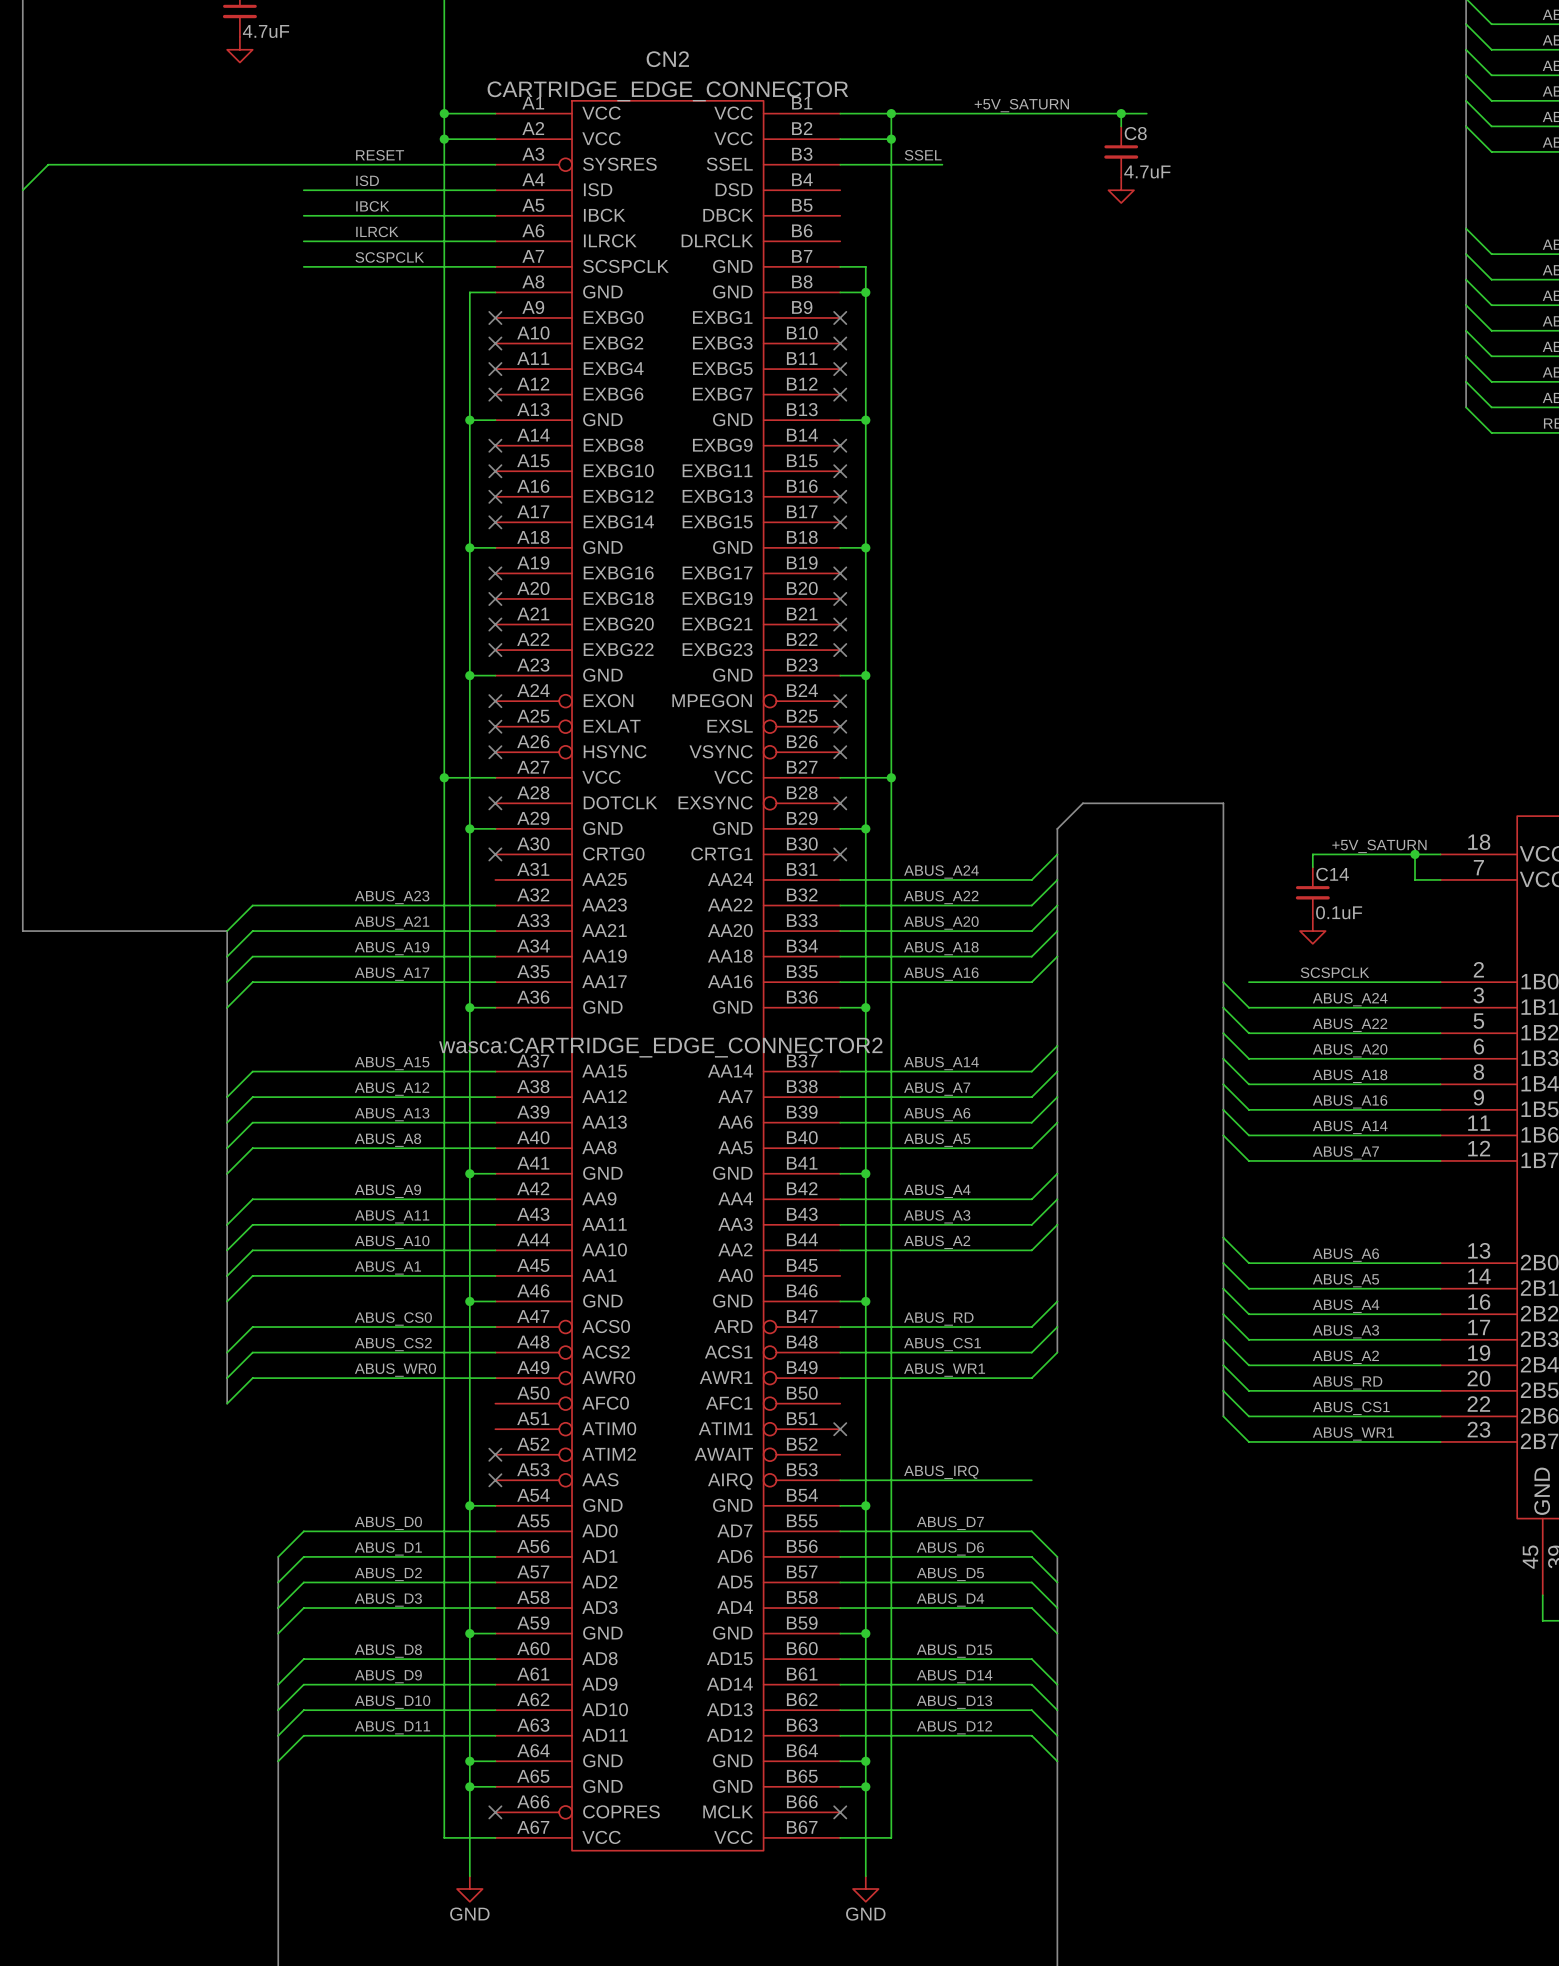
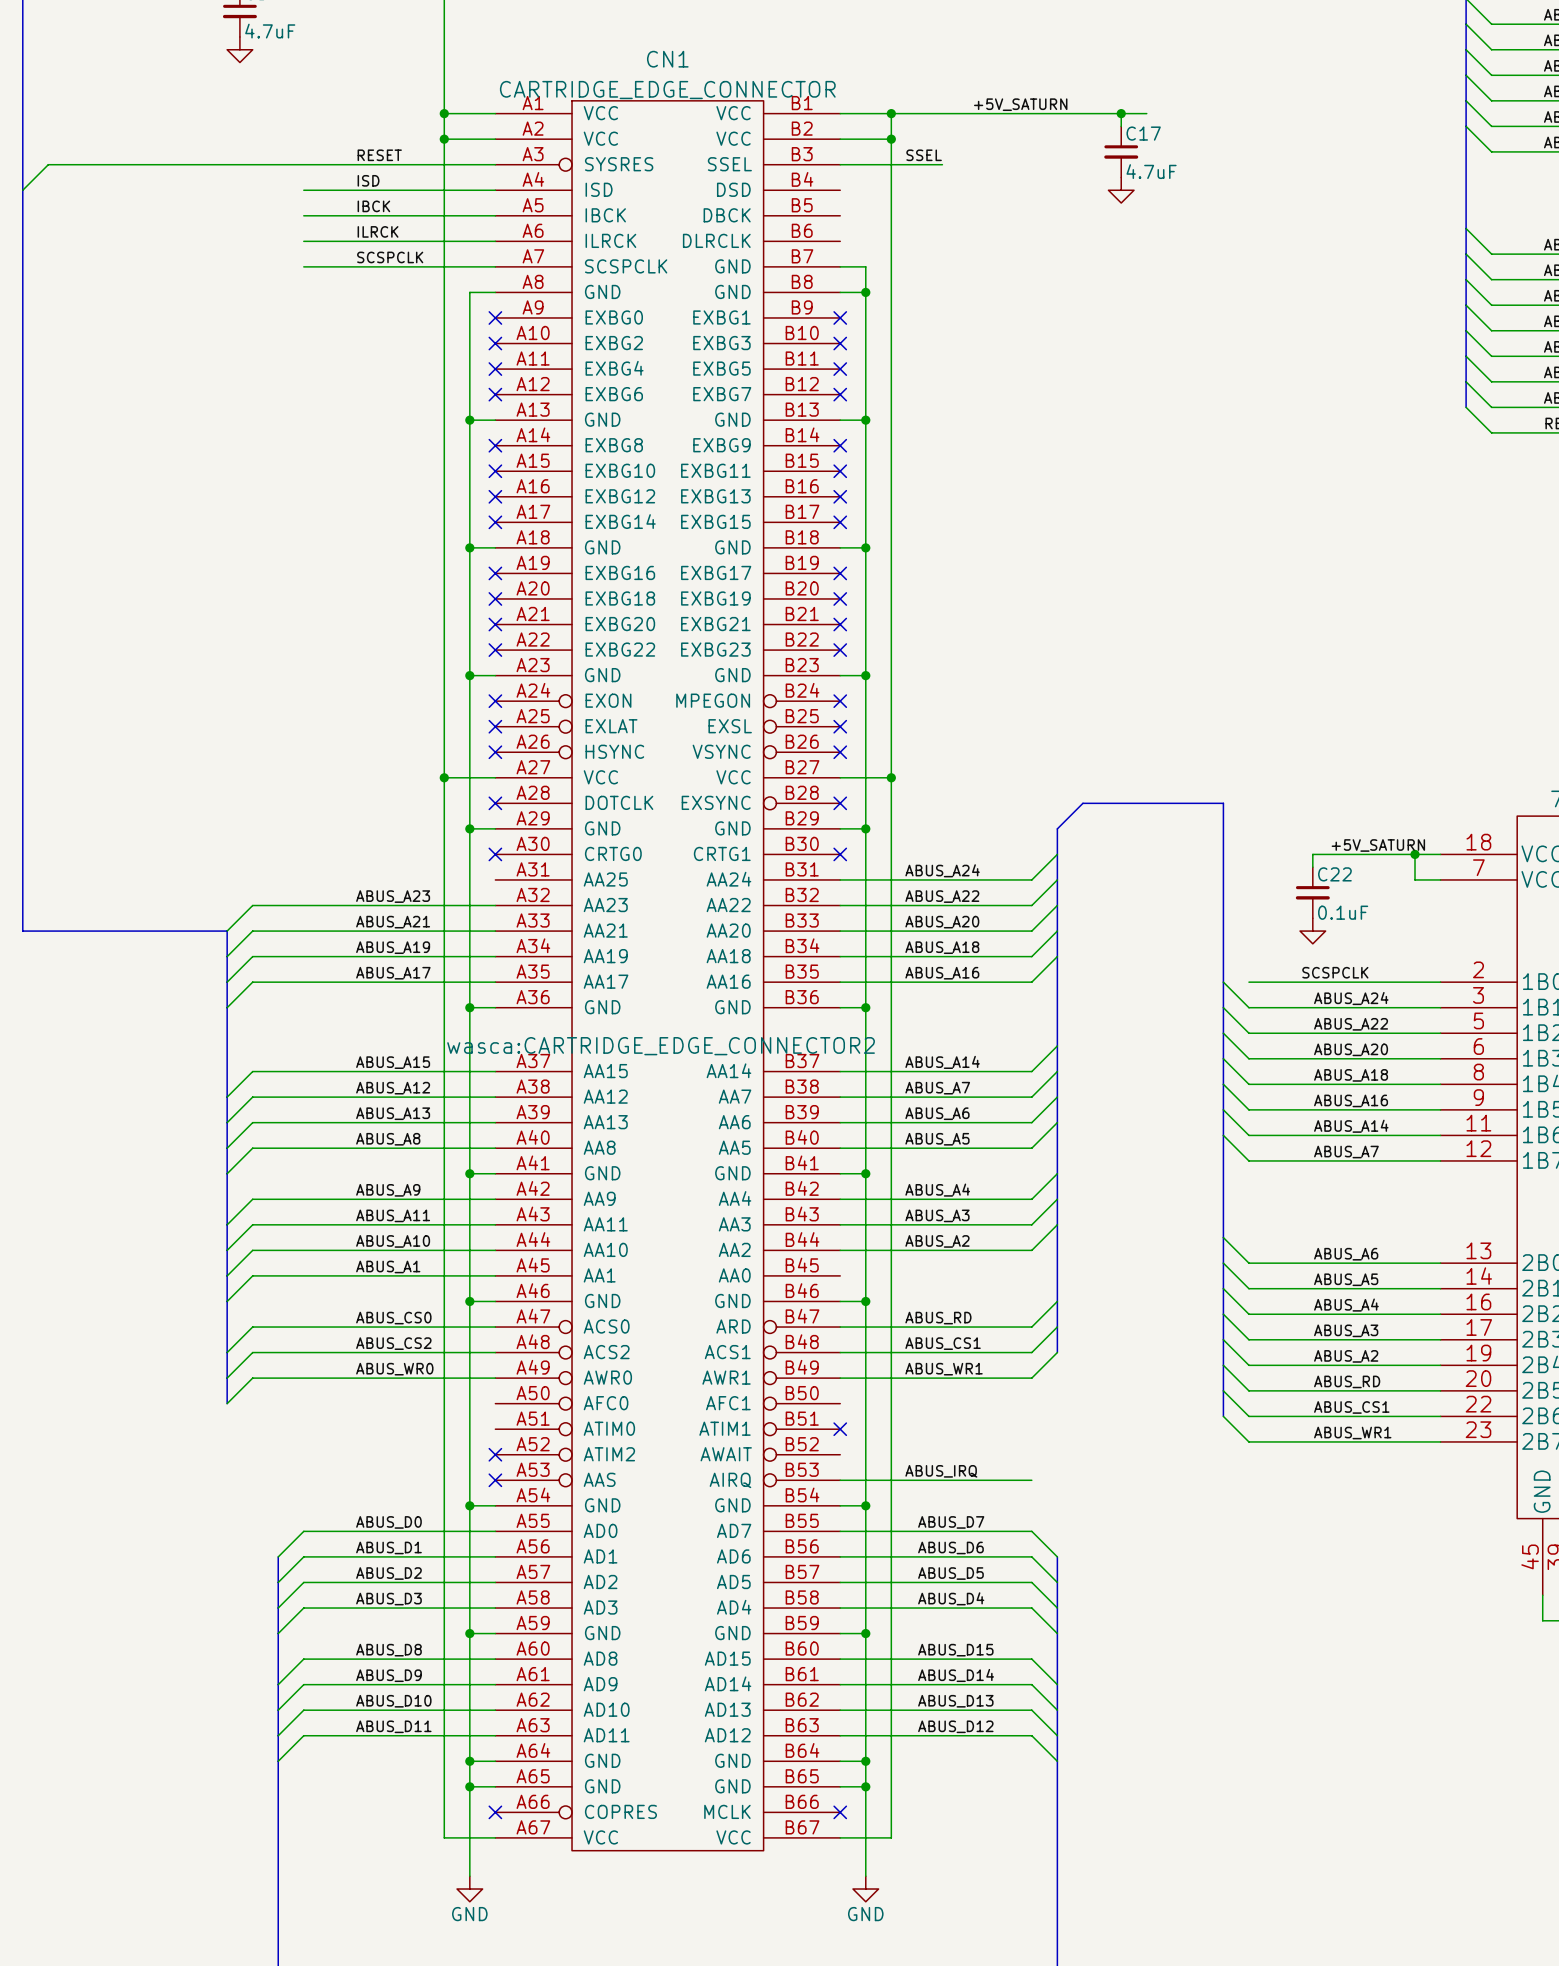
CN2 name: CN2 (667, 59) -> CN1 (667, 59)
C8 name: C8 (1135, 133) -> C17 (1143, 133)
C14 name: C14 (1332, 874) -> C22 (1334, 874)

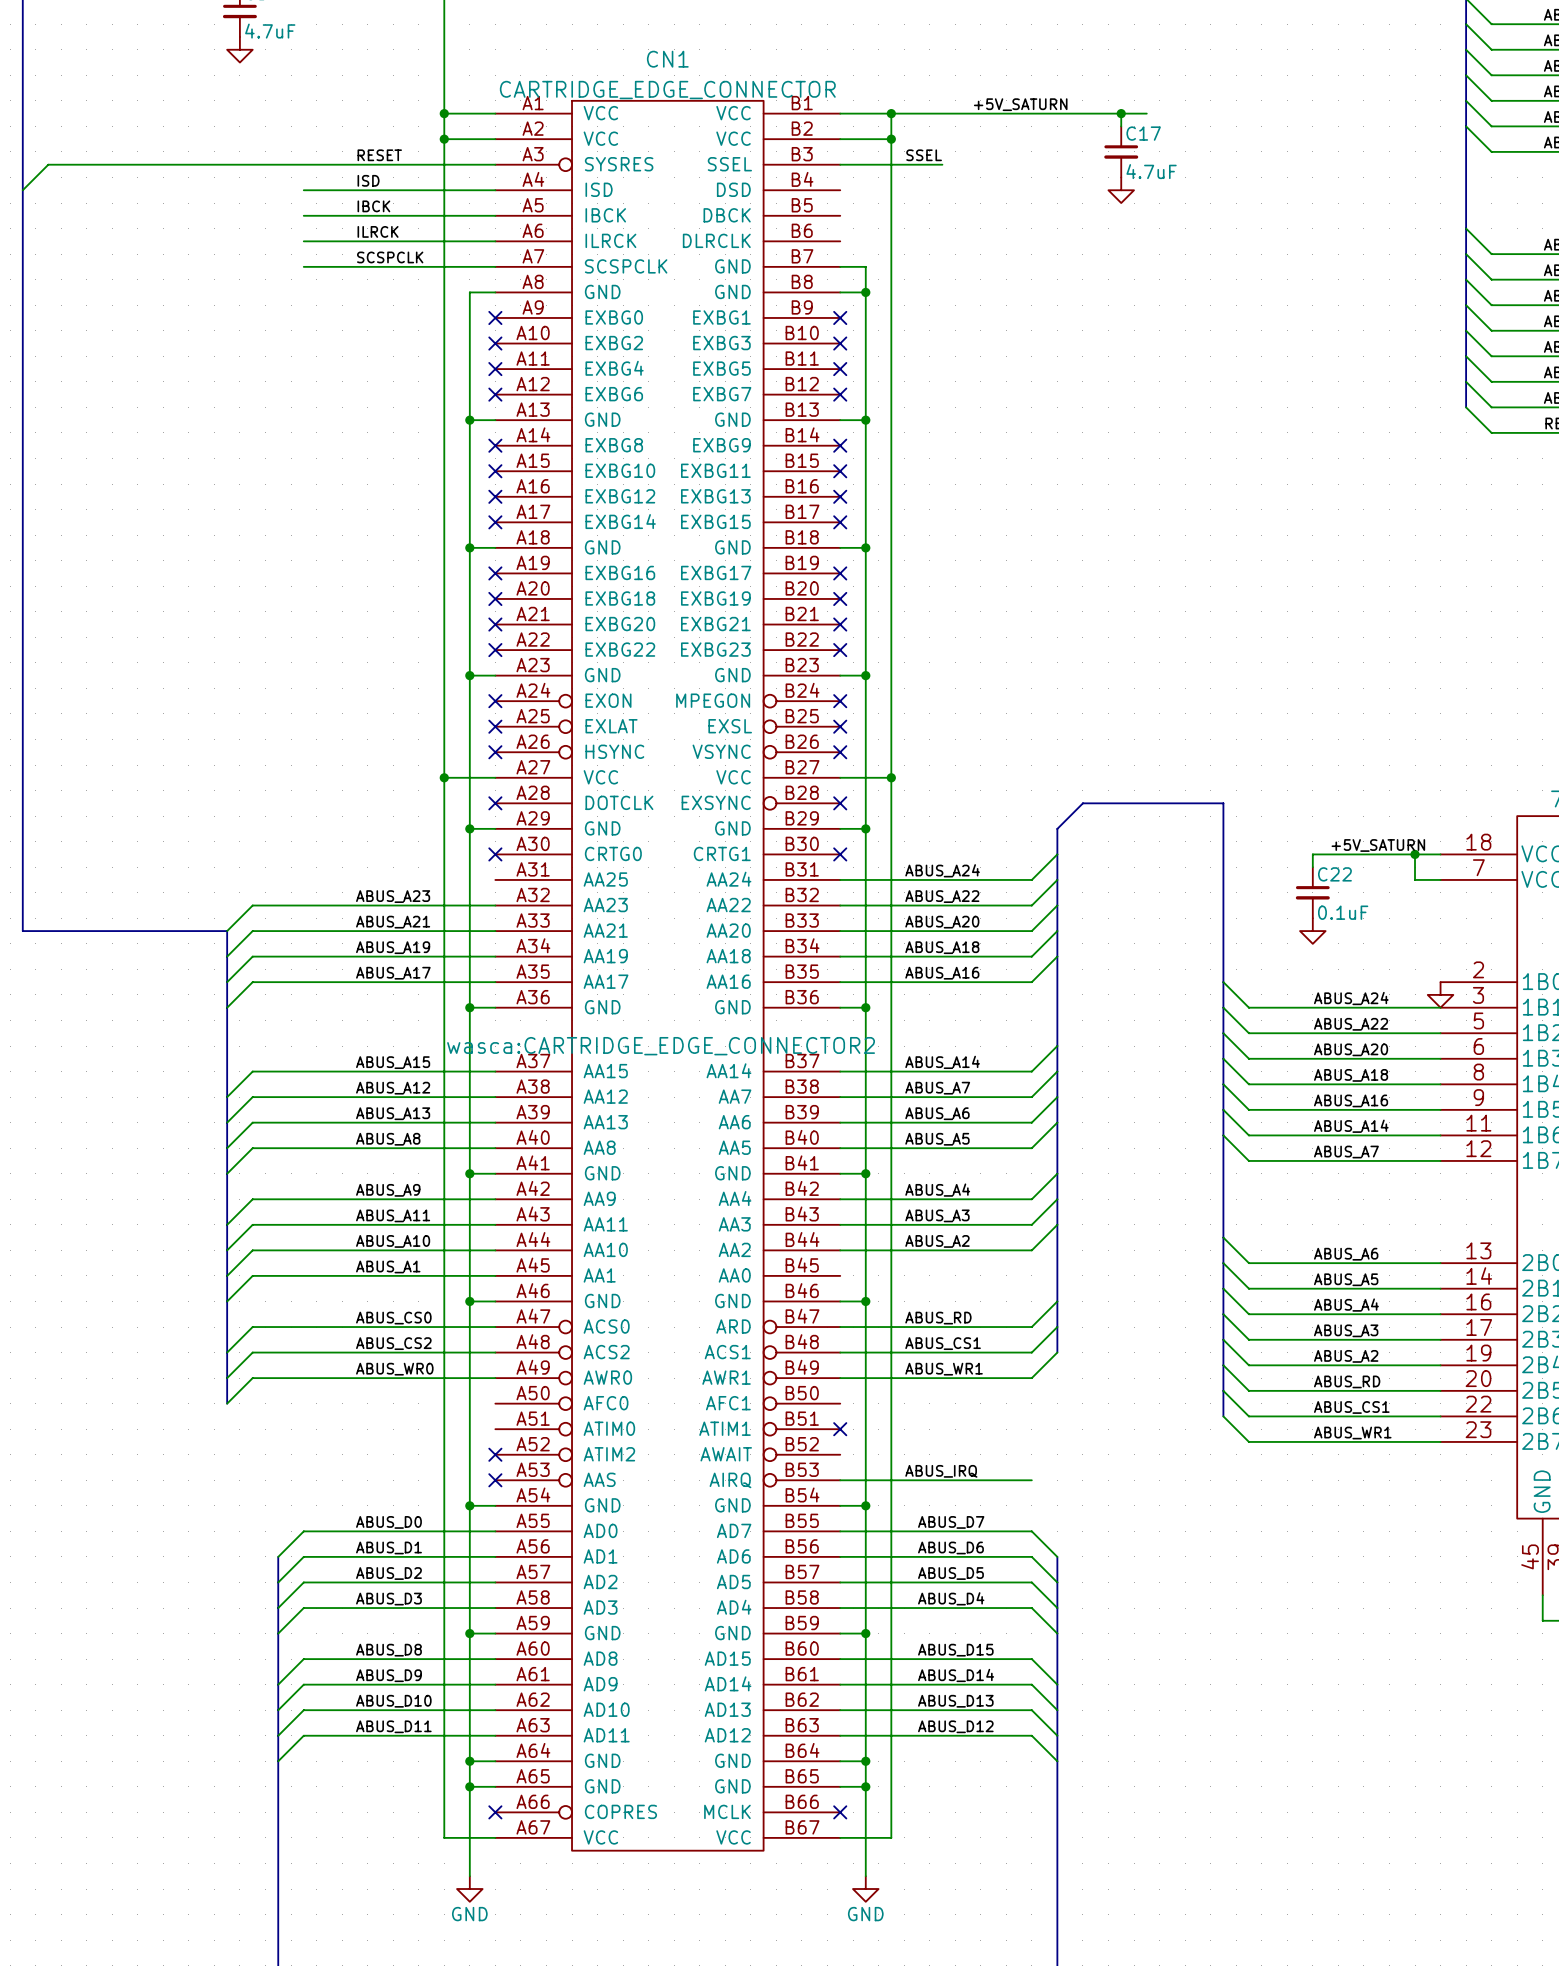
label: SCSPCLK (1335, 972) -> none
wire: (1248, 982) (1440, 982) -> none
power symbol: none -> (1440, 994)

